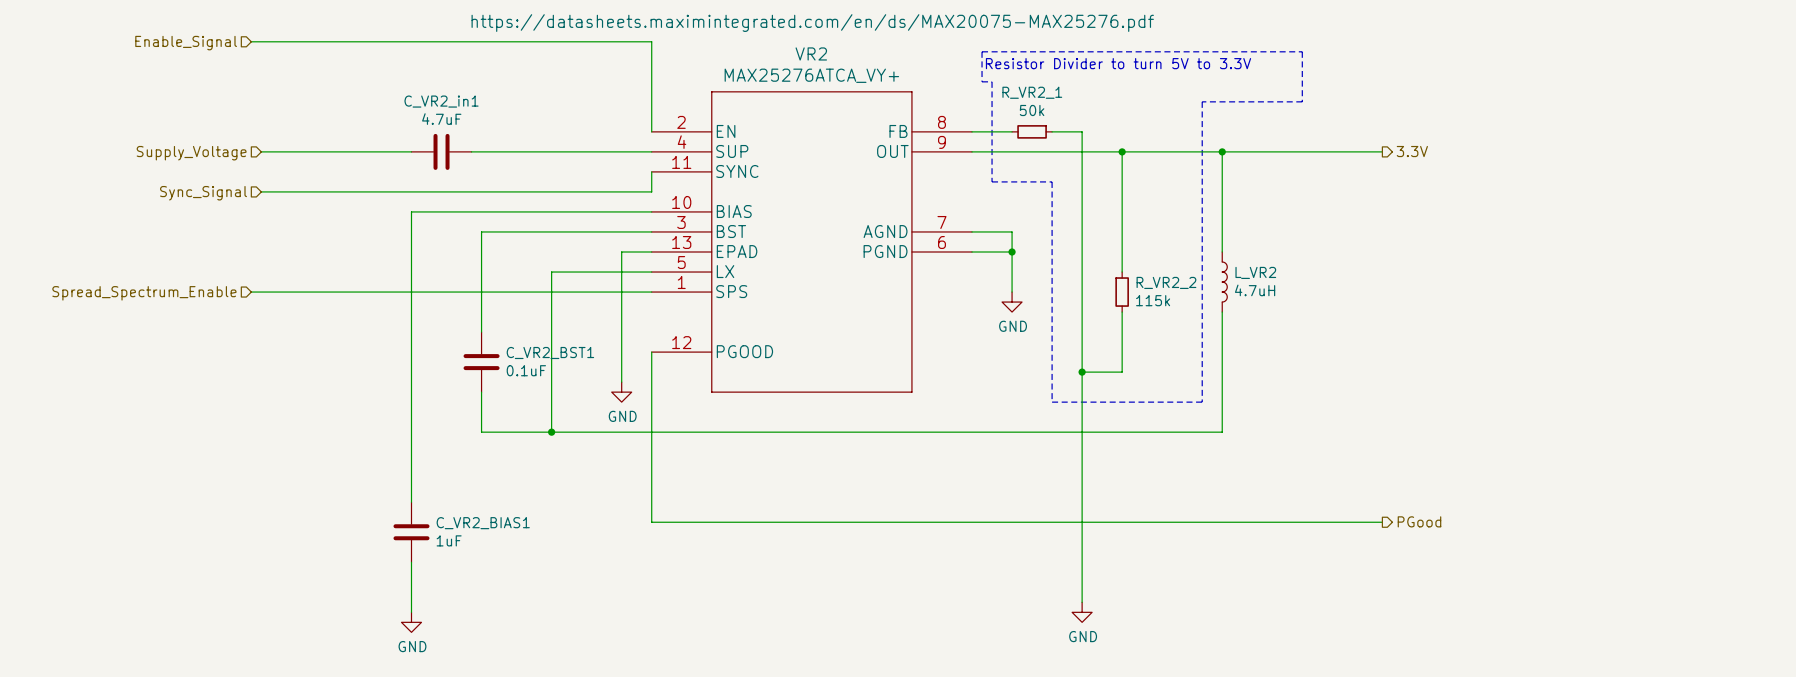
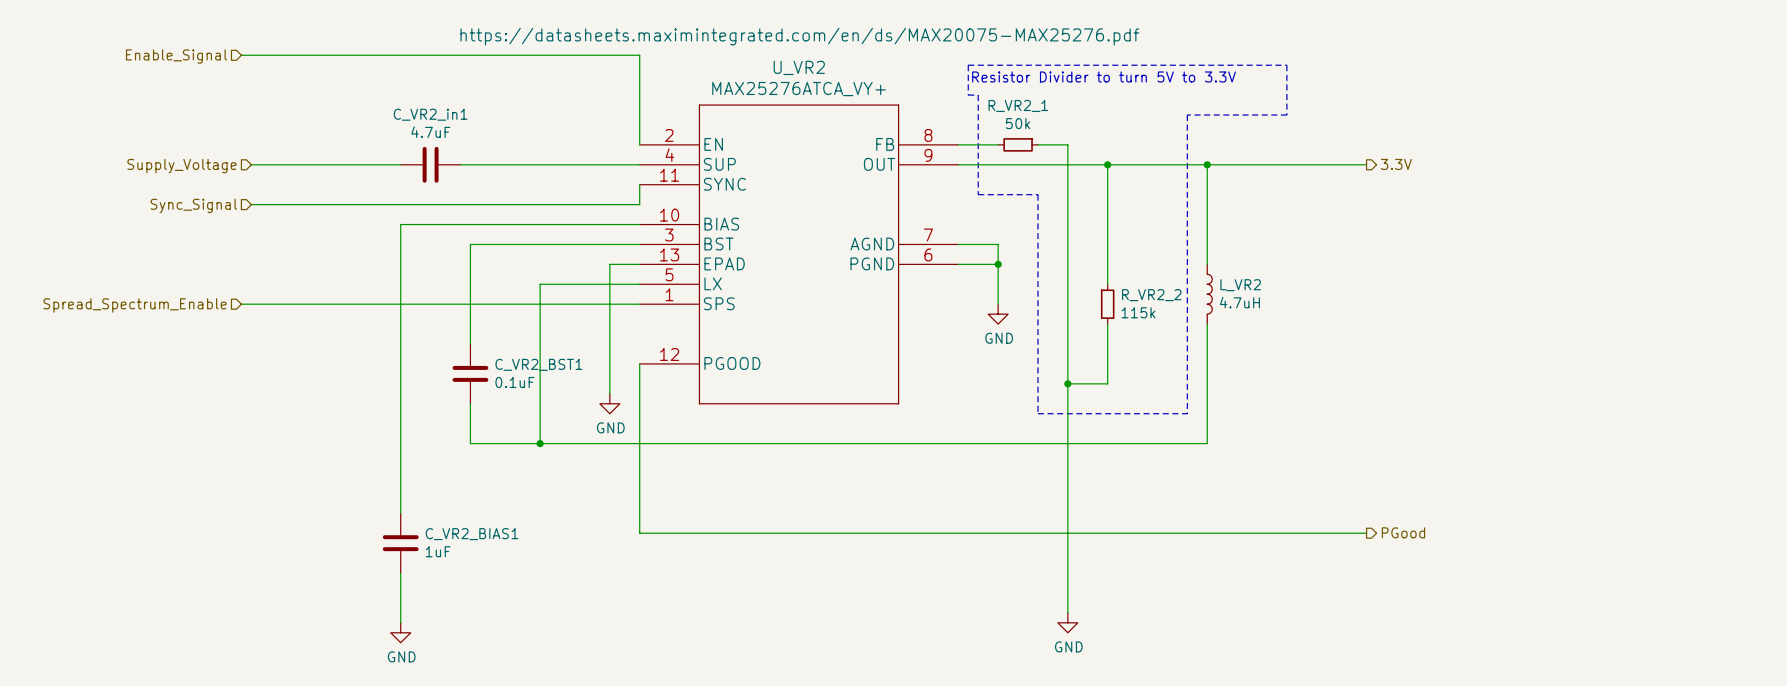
VR2 name: VR2 (811, 53) -> U_VR2 (799, 67)

